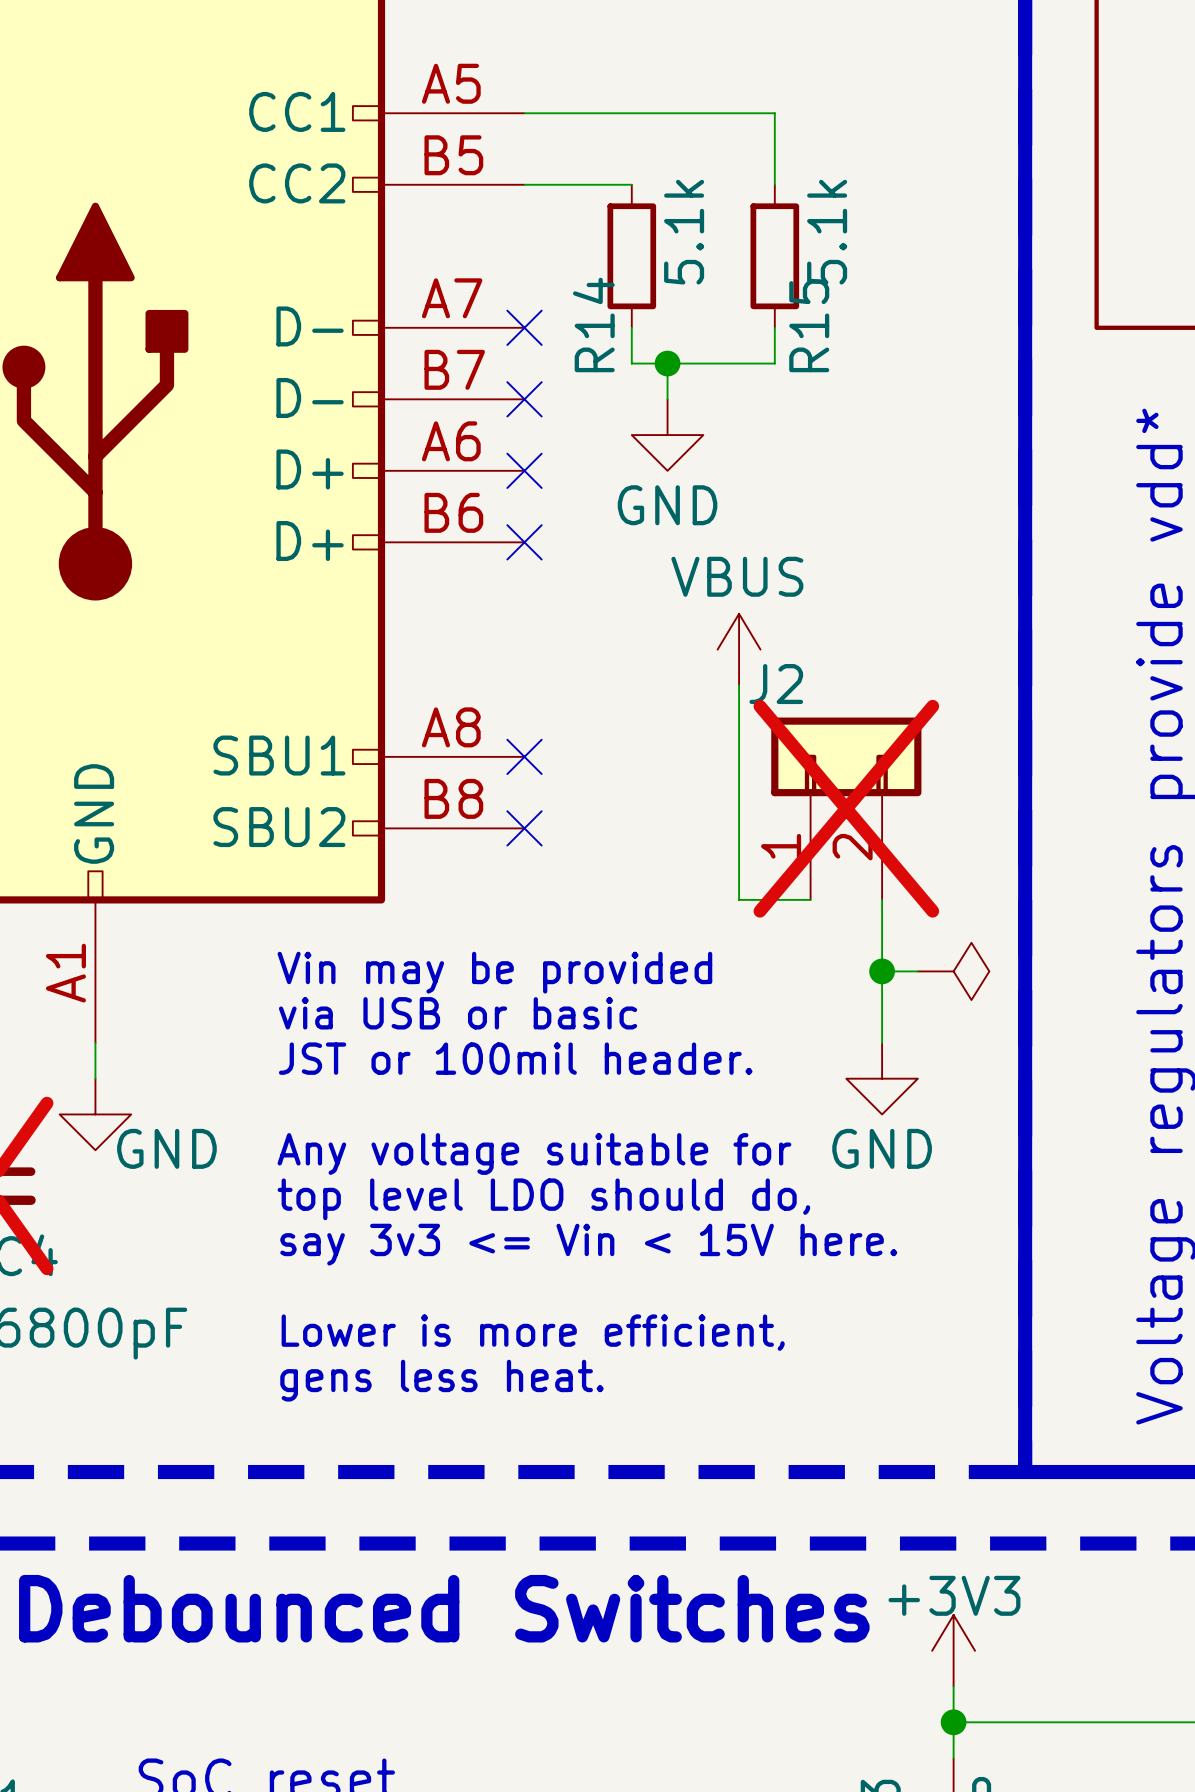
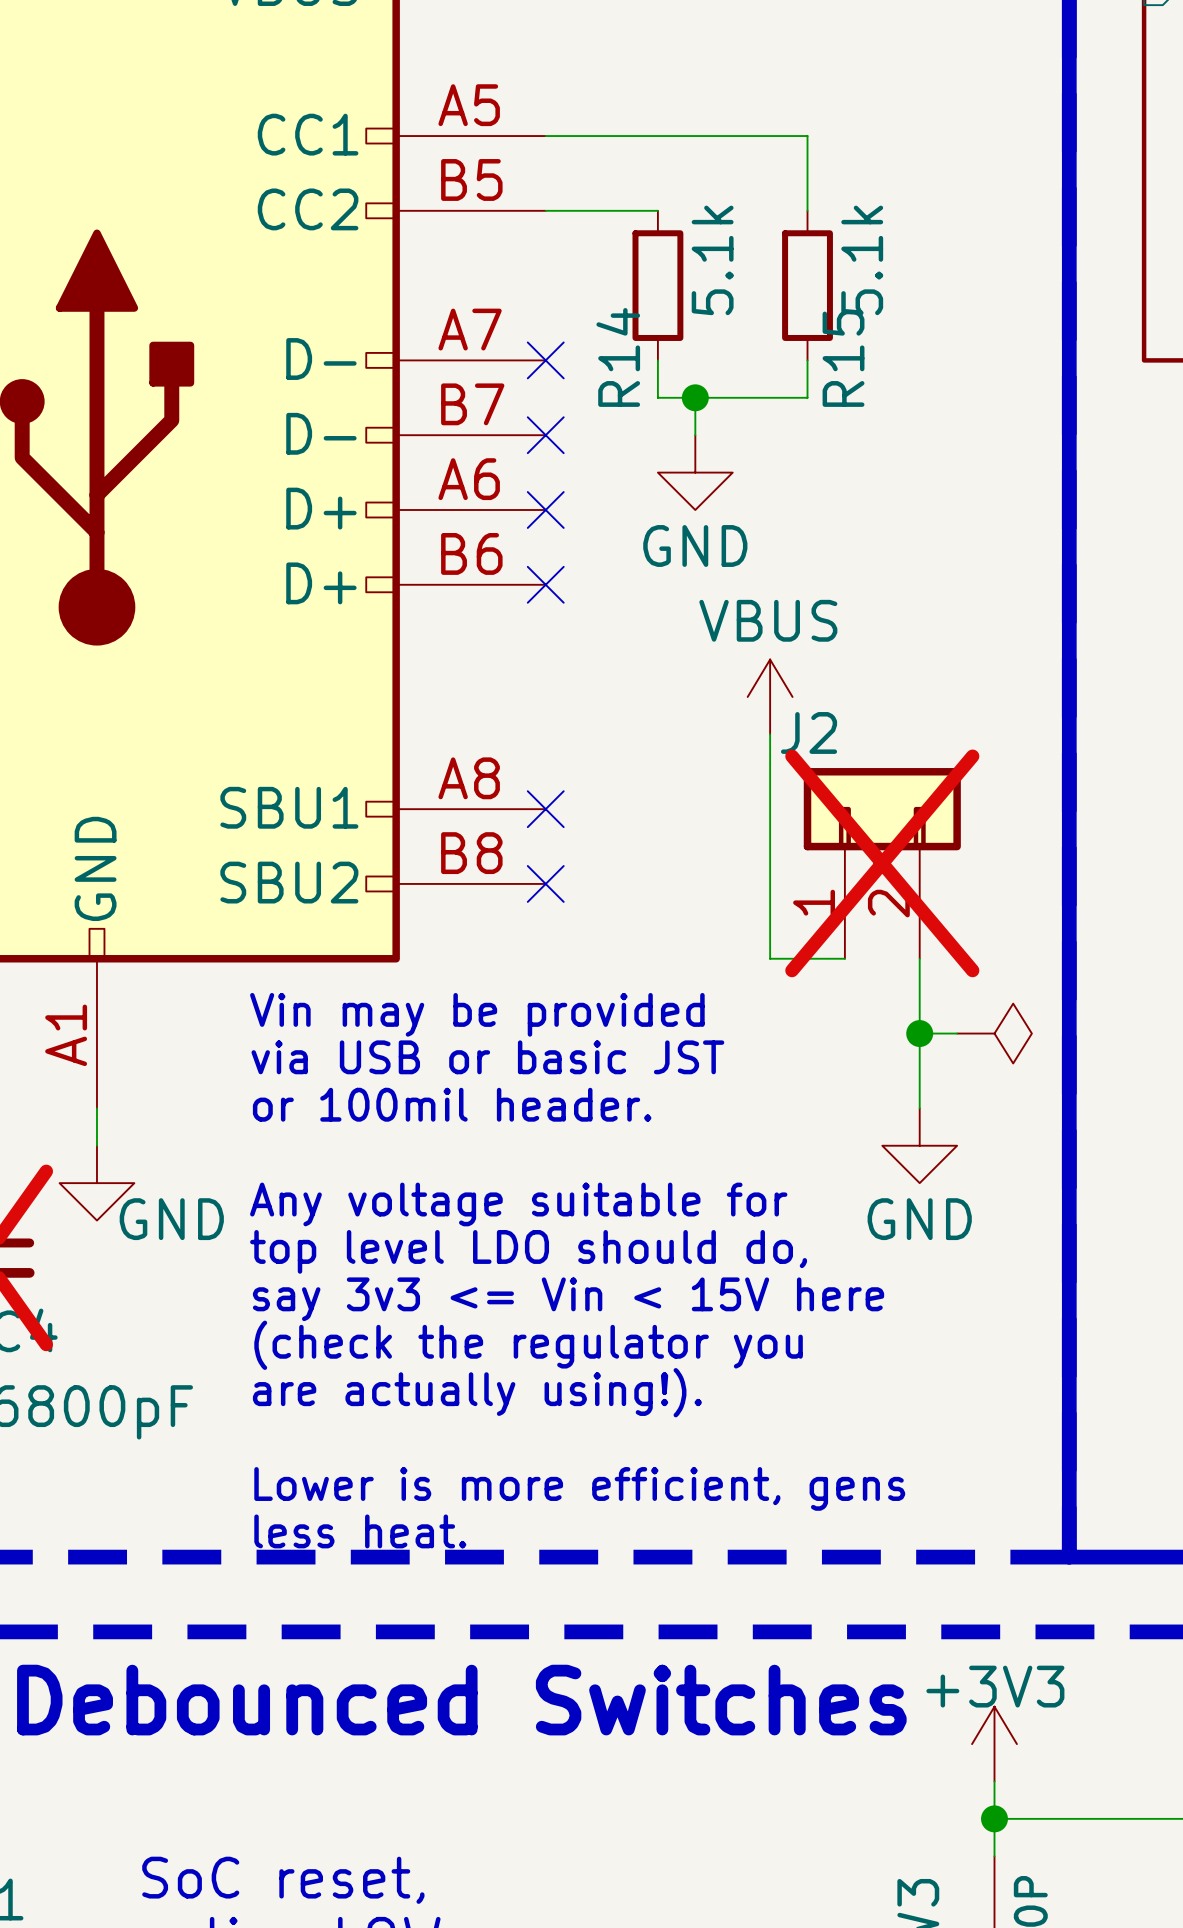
text position: Vin may be provided (494, 972) -> Vin may be provided (477, 1014)
text: via USB or basic (458, 1013) -> via USB or basic JST (487, 1057)
text: JST or 100mil header. (515, 1058) -> or 100mil header. (452, 1104)
text position: Any voltage suitable for (534, 1153) -> Any voltage suitable for (518, 1204)
text position: top level LDO should do, (543, 1199) -> top level LDO should do, (528, 1251)
text: say 3v3 <= Vin < 15V here. (588, 1244) -> say 3v3 <= Vin < 15V here (568, 1299)
text: none -> (check the regulator you (528, 1345)
text: none -> are actually using!). (477, 1392)
text: Lower is more efficient, (533, 1332) -> none
text: gens less heat. (441, 1380) -> none
text: none -> Lower is more efficient, gens (579, 1488)
text: none -> less heat. (360, 1531)

